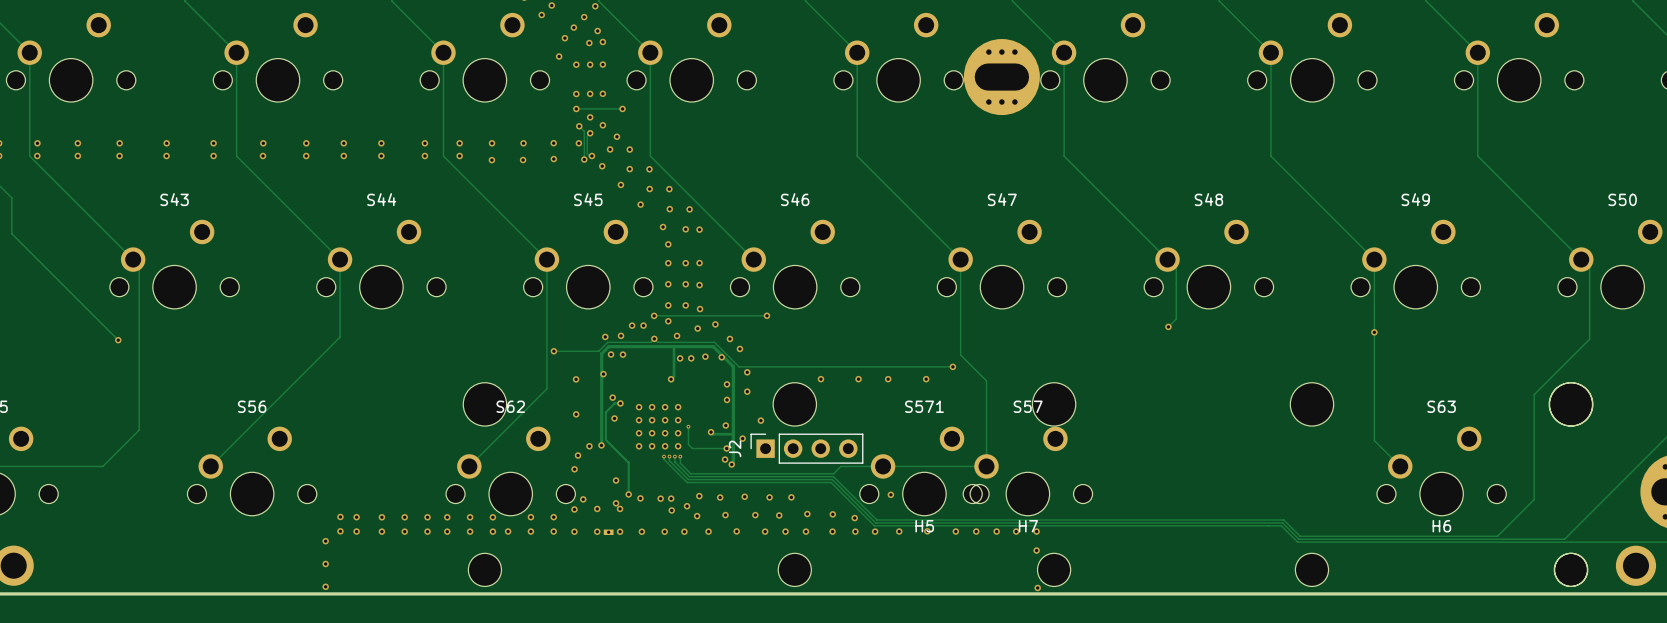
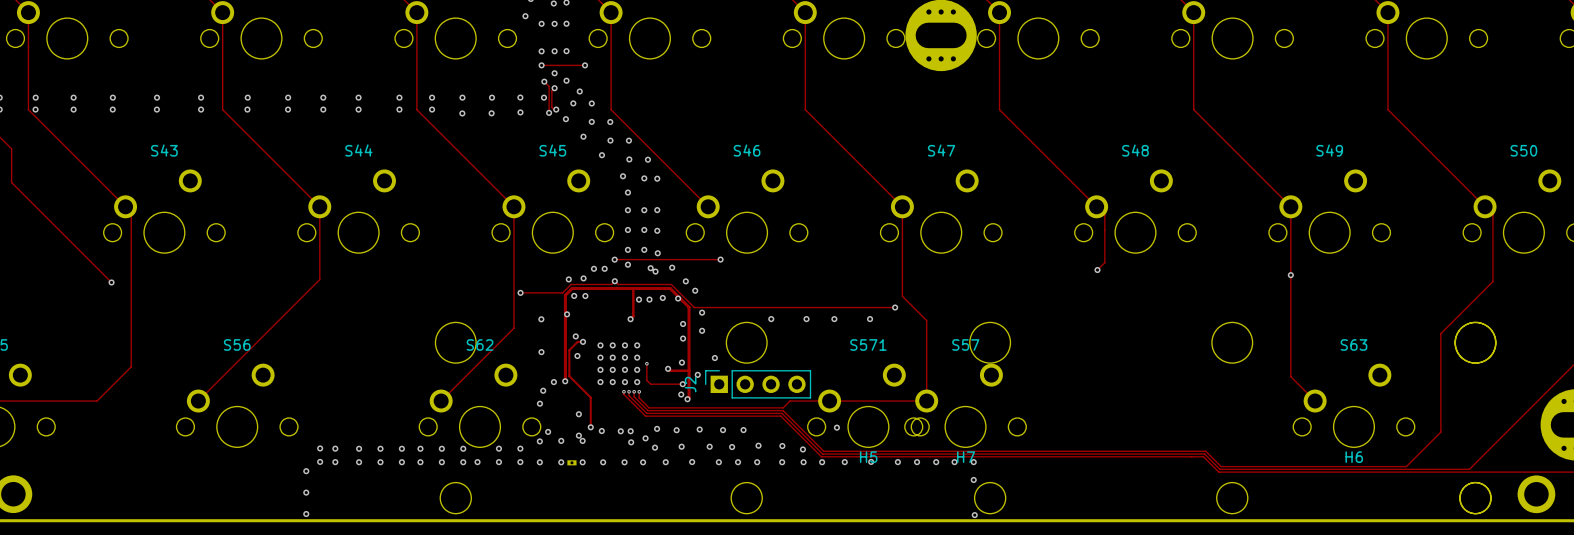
via position: (677, 335) -> (650, 268)

